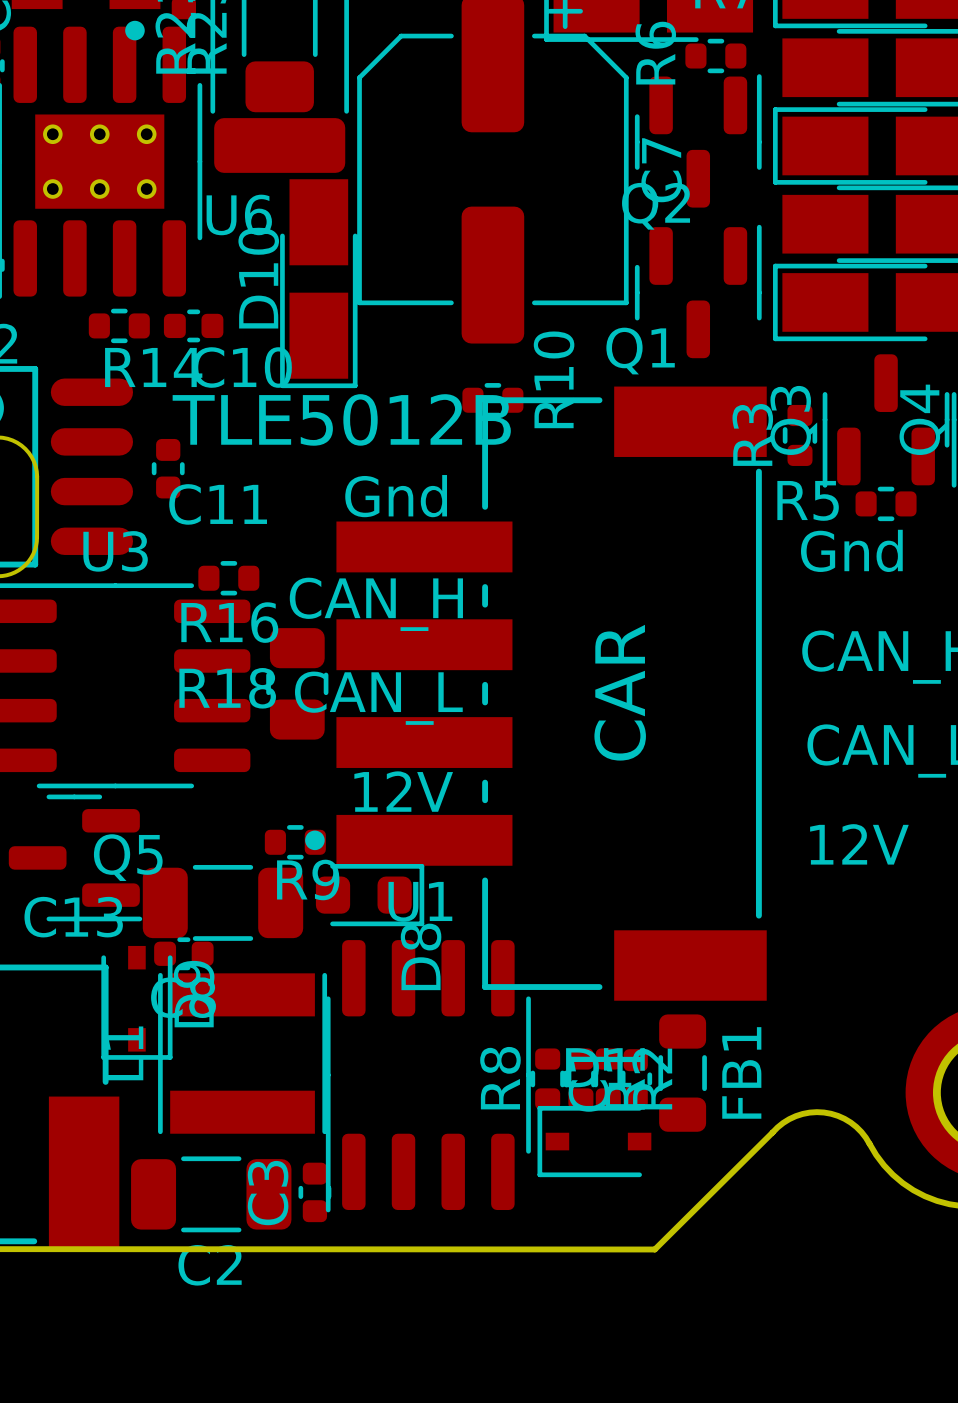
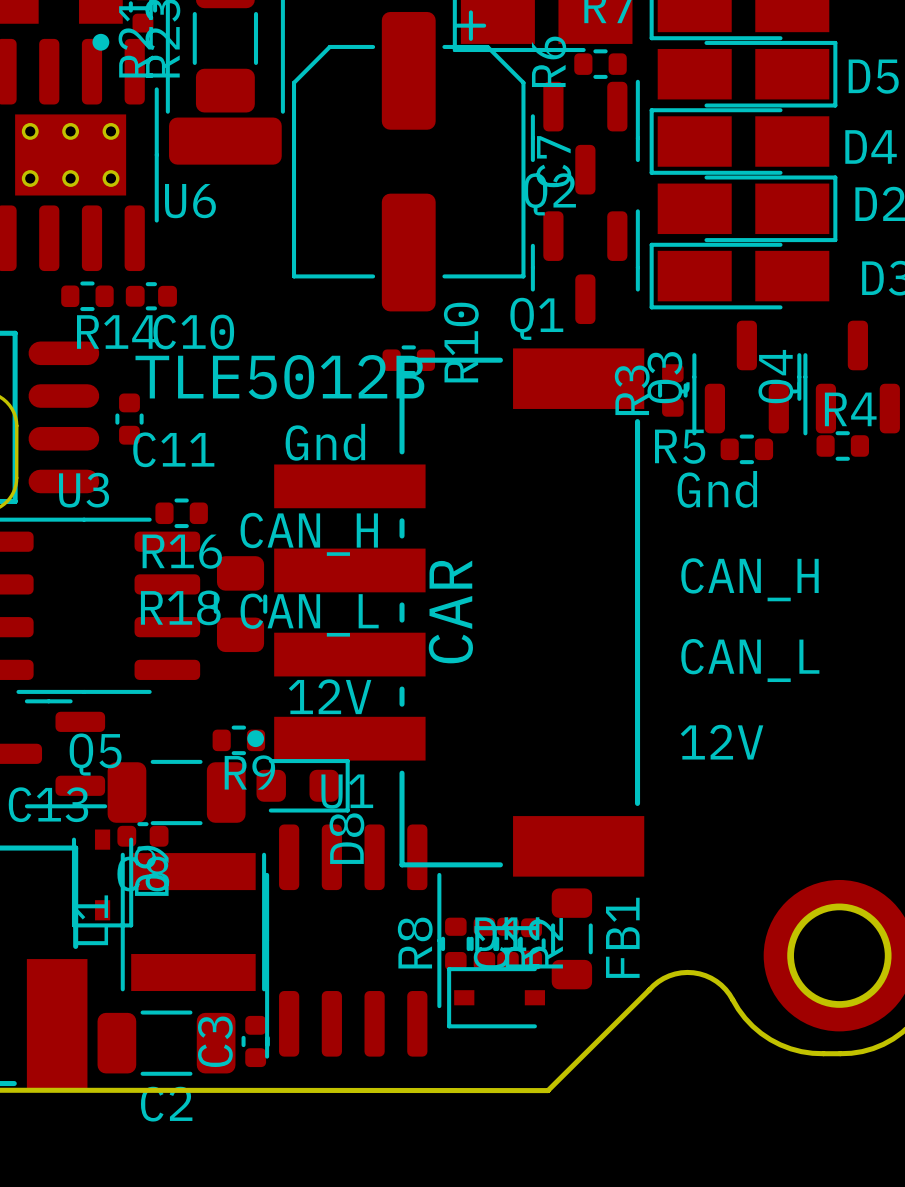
D10: (318, 283) -> none
part value position: CAR (620, 692) -> CAR (450, 611)

